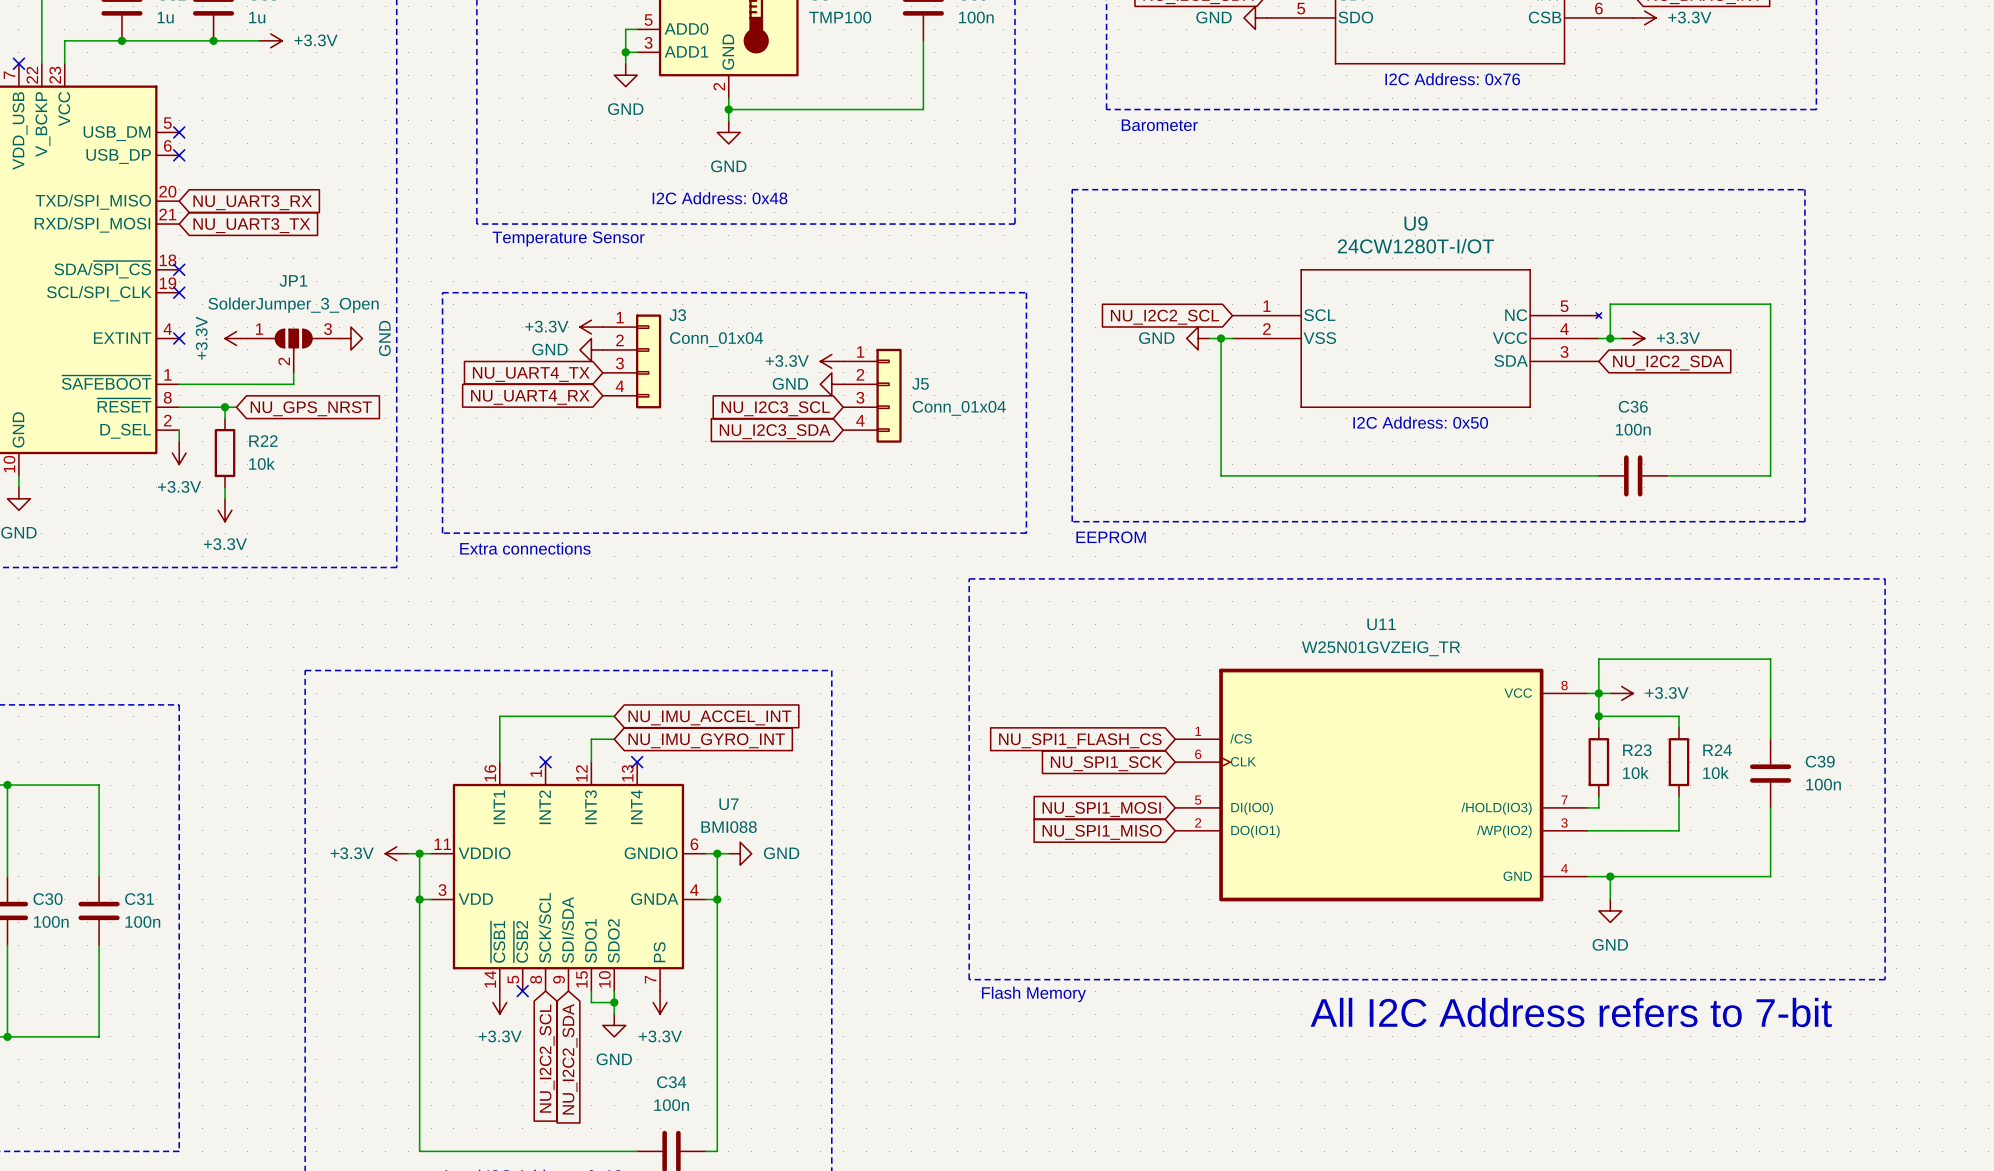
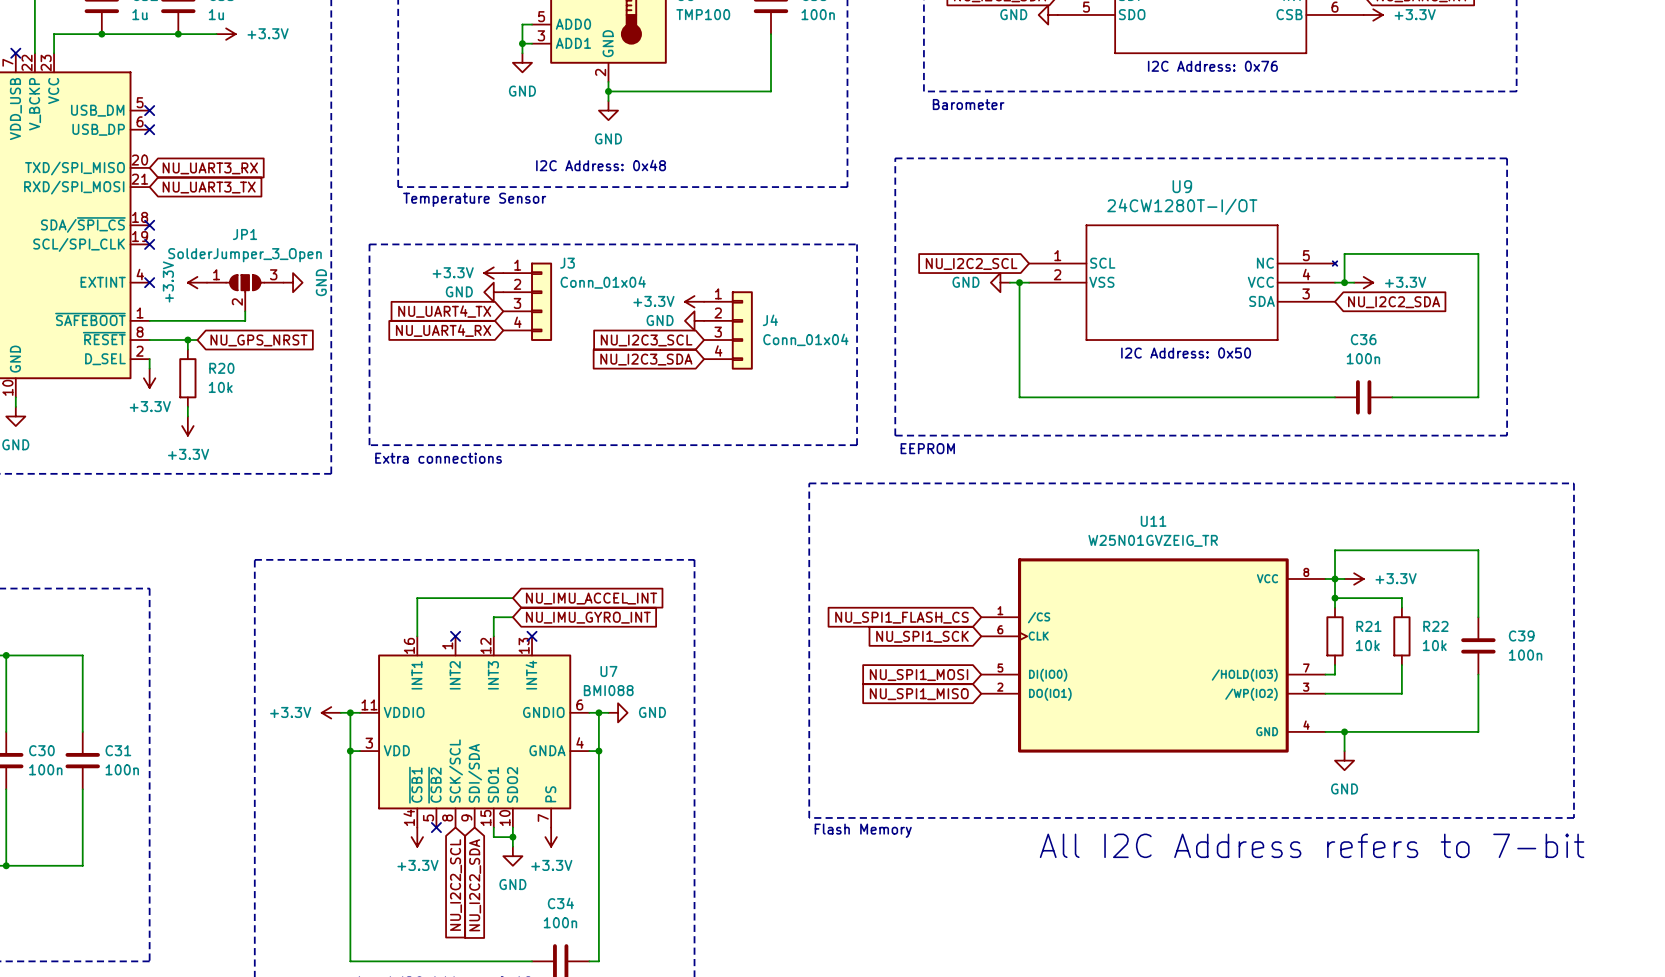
J5 name: J5 (920, 383) -> J4 (770, 320)
R22 name: R22 (263, 441) -> R20 (221, 368)
R23 name: R23 (1637, 750) -> R21 (1368, 626)
R24 name: R24 (1717, 750) -> R22 (1435, 626)

